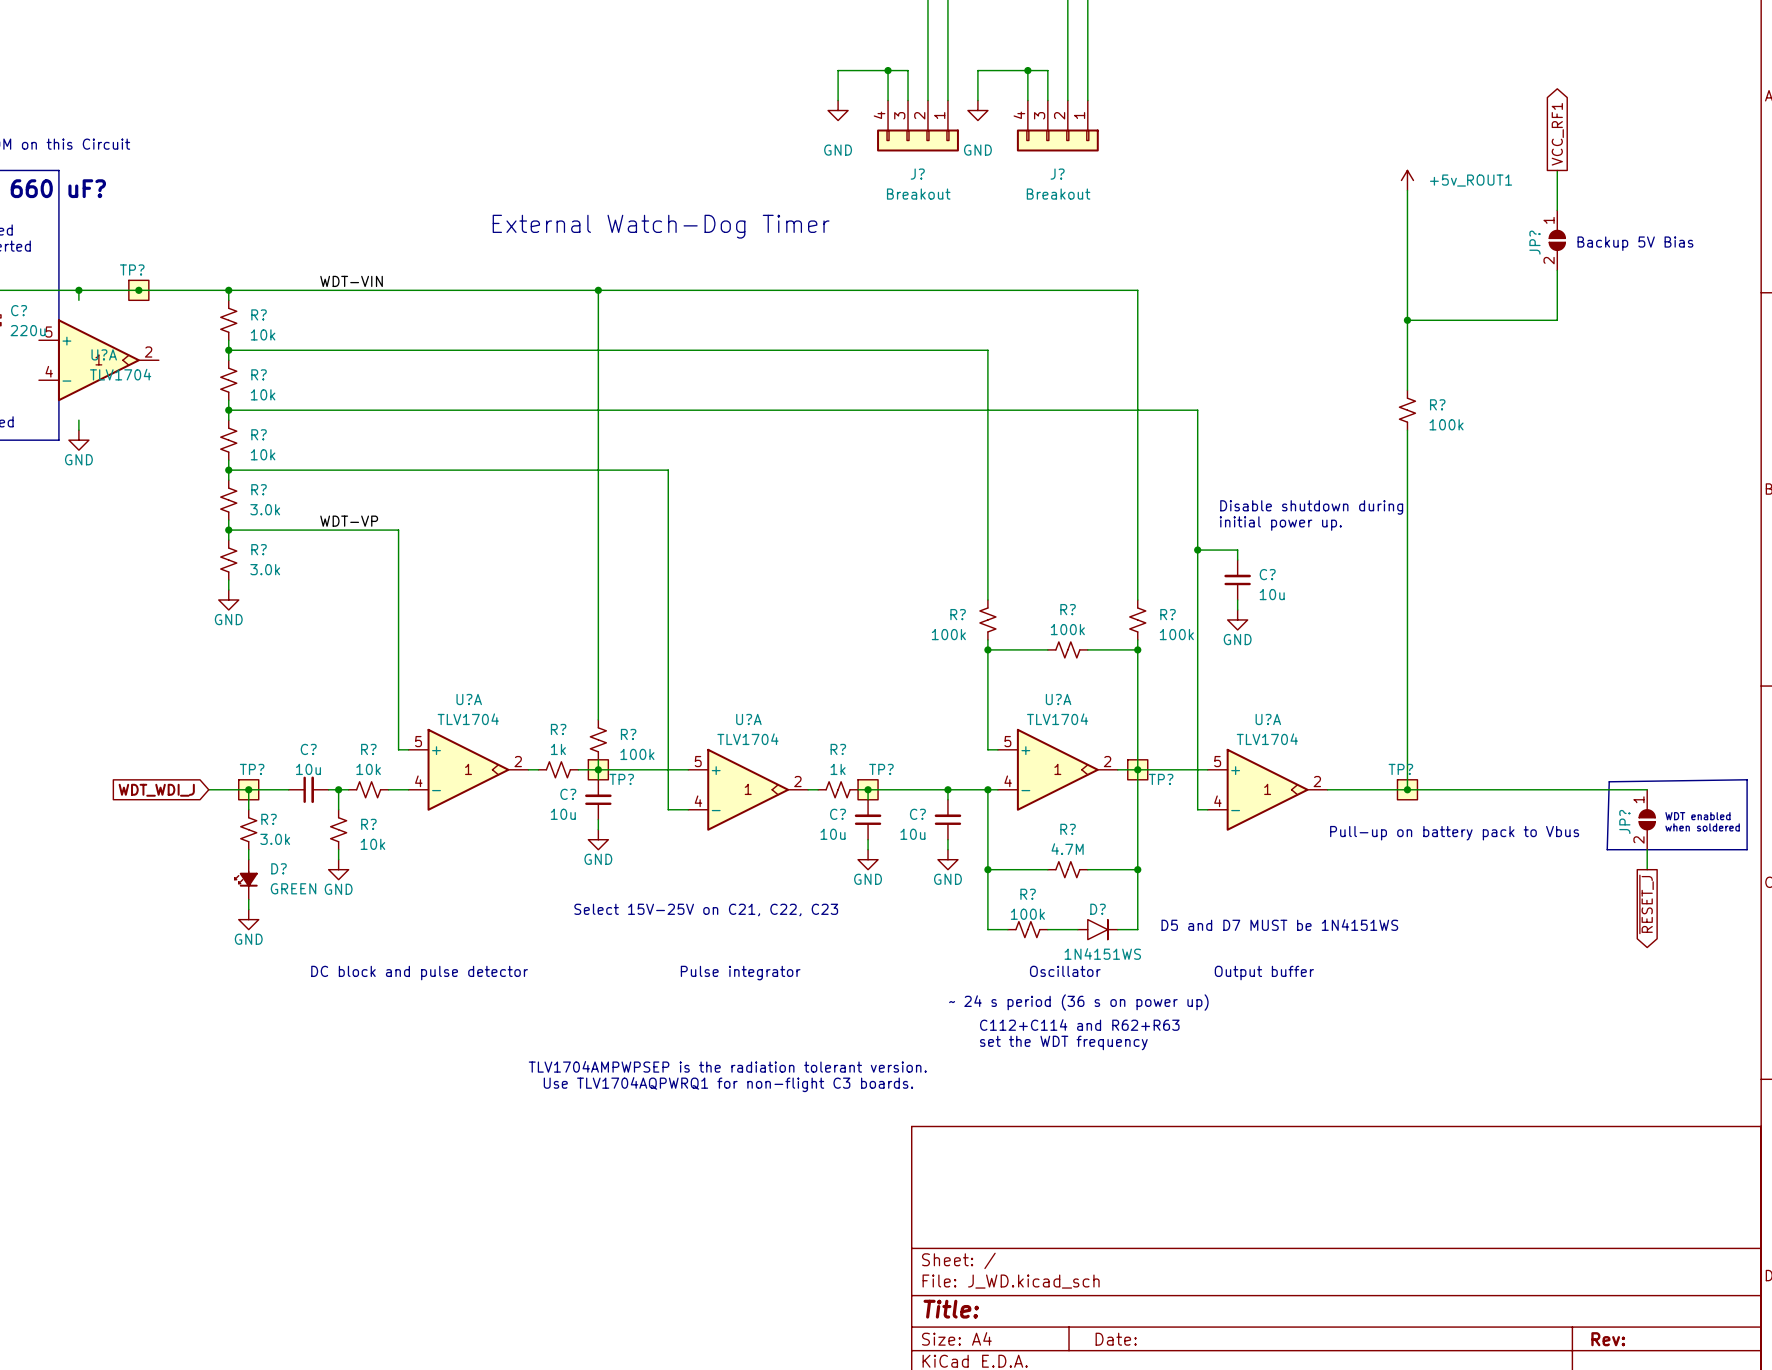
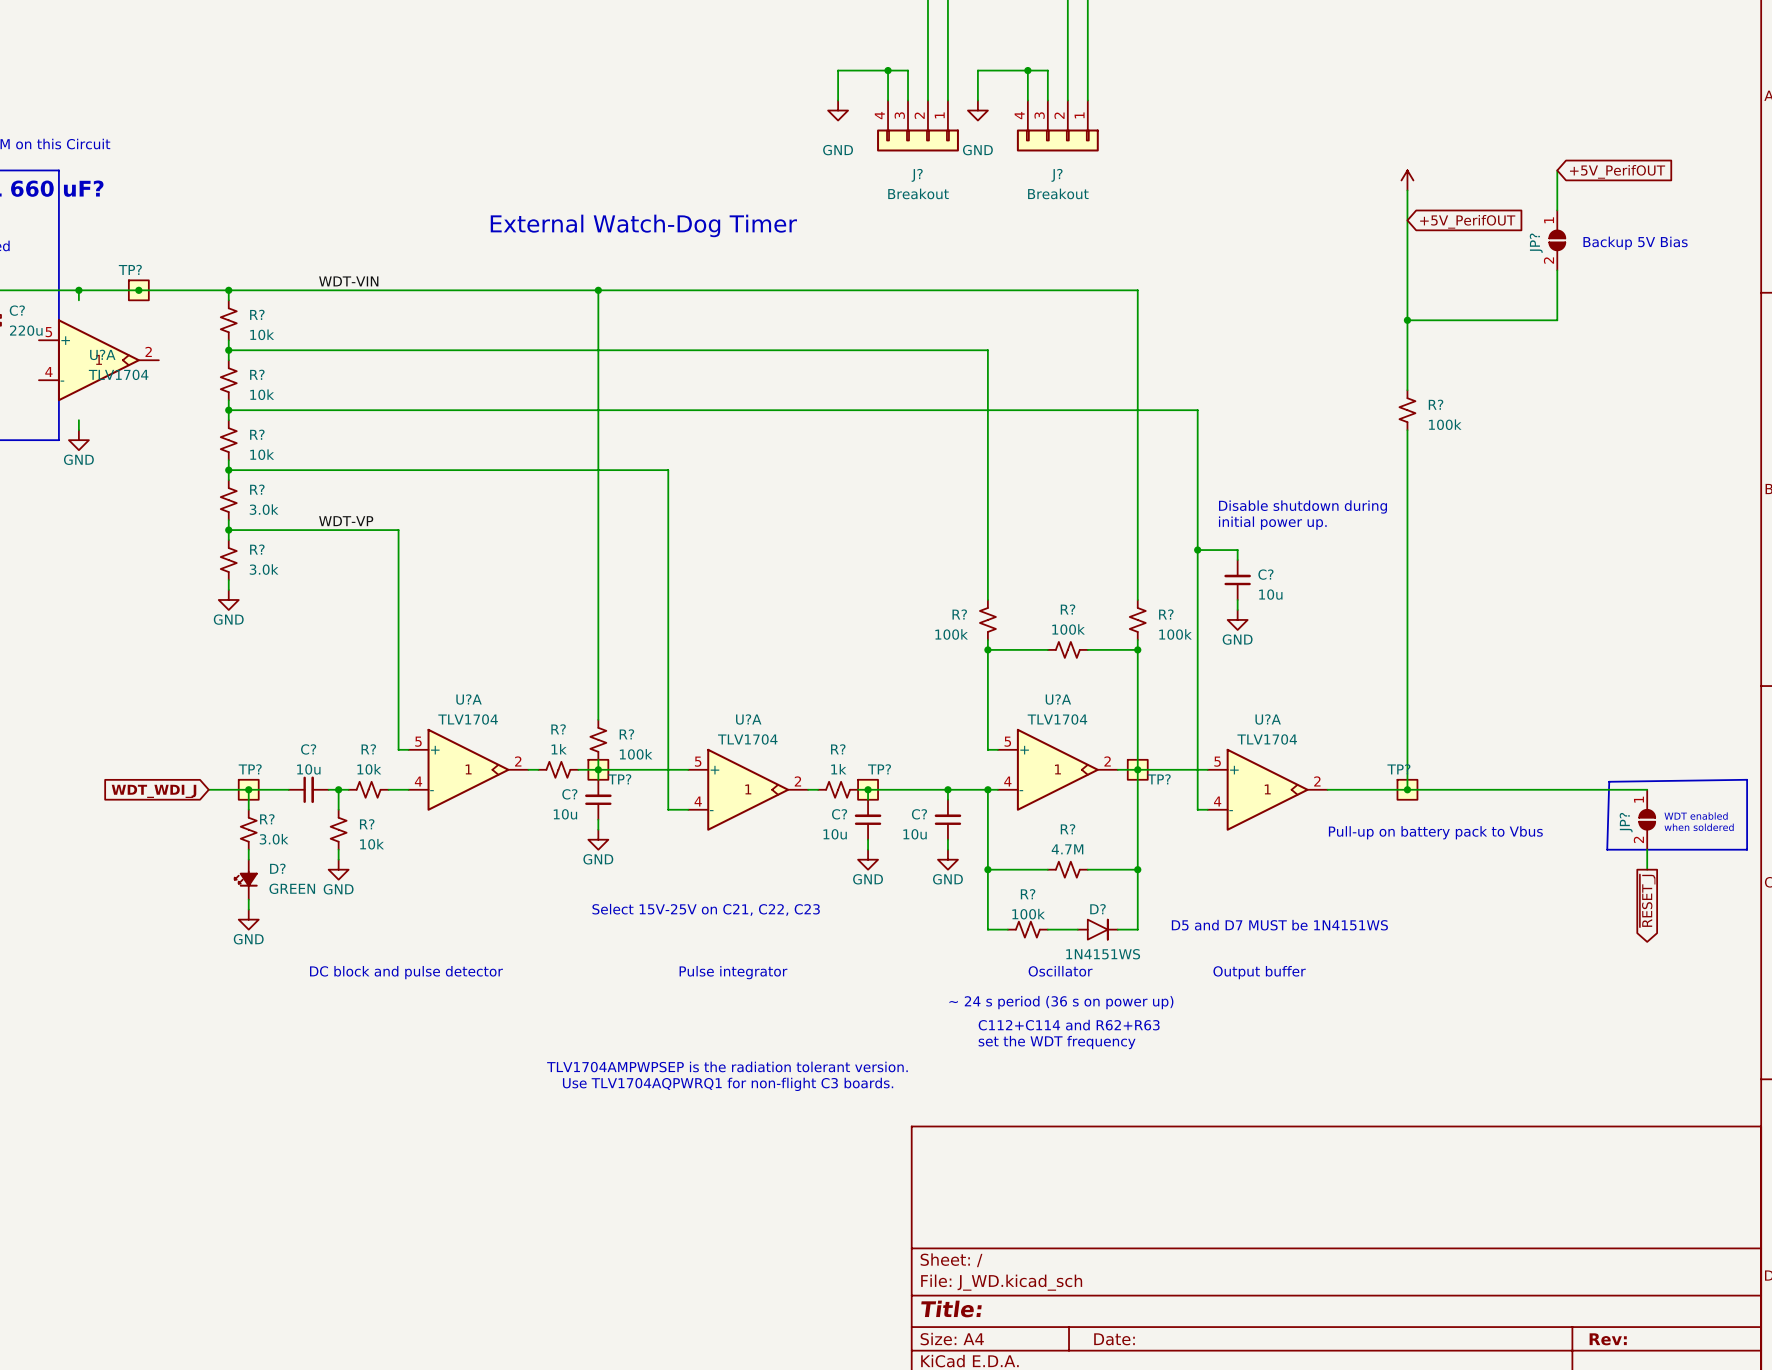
global label shape: output (1557, 134) -> input (1617, 171)
global label: VCC_RF1 (1557, 134) -> +5V_PerifOUT (1617, 171)
power symbol text: +5v_ROUT1 (1471, 180) -> none
global label: none -> +5V_PerifOUT (1467, 221)

